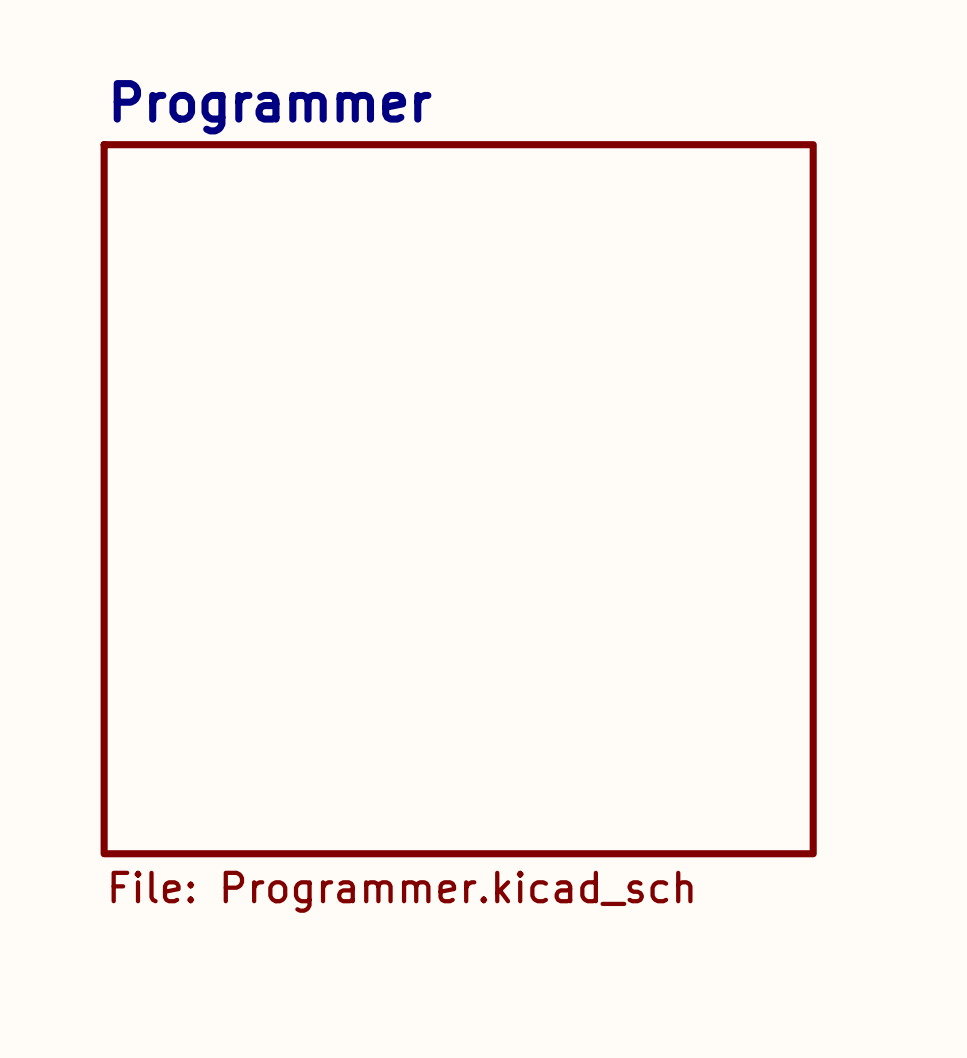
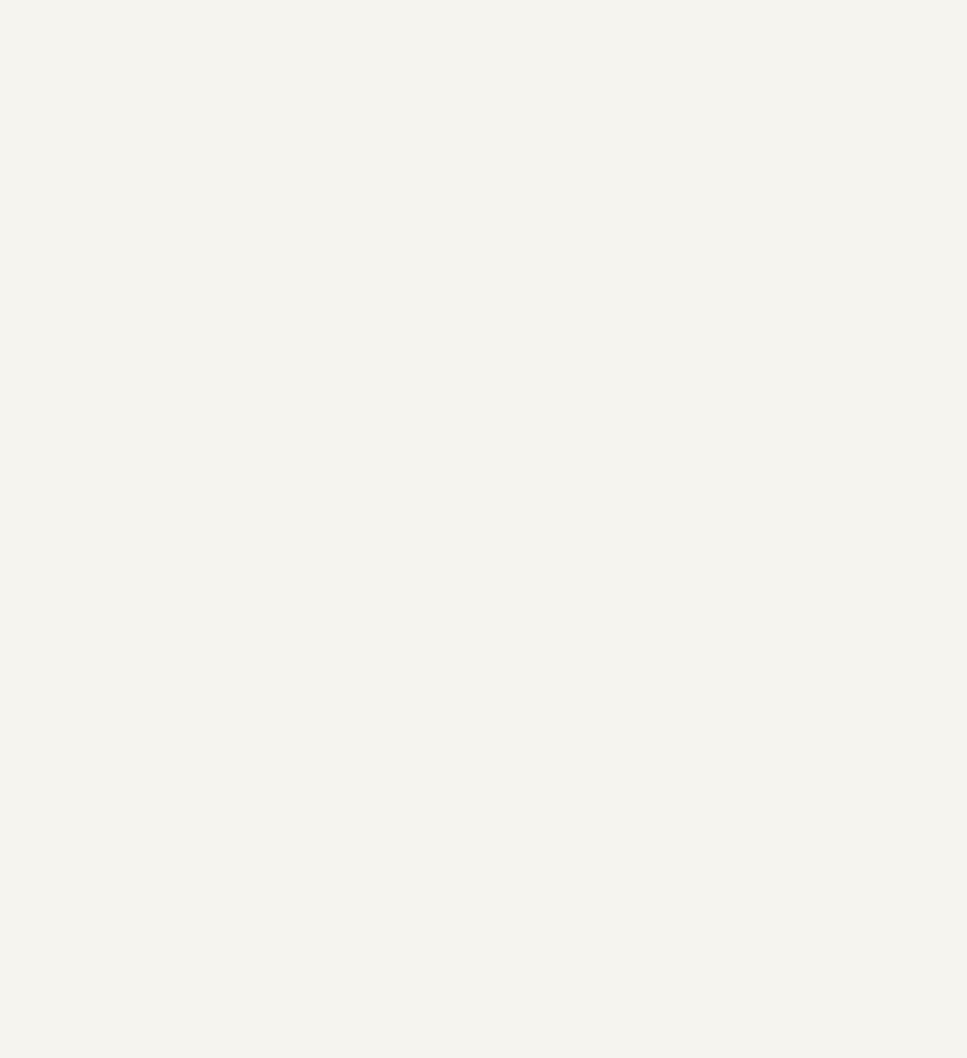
sheet Programmer: File: Programmer.kicad_sch (458, 499) -> none

